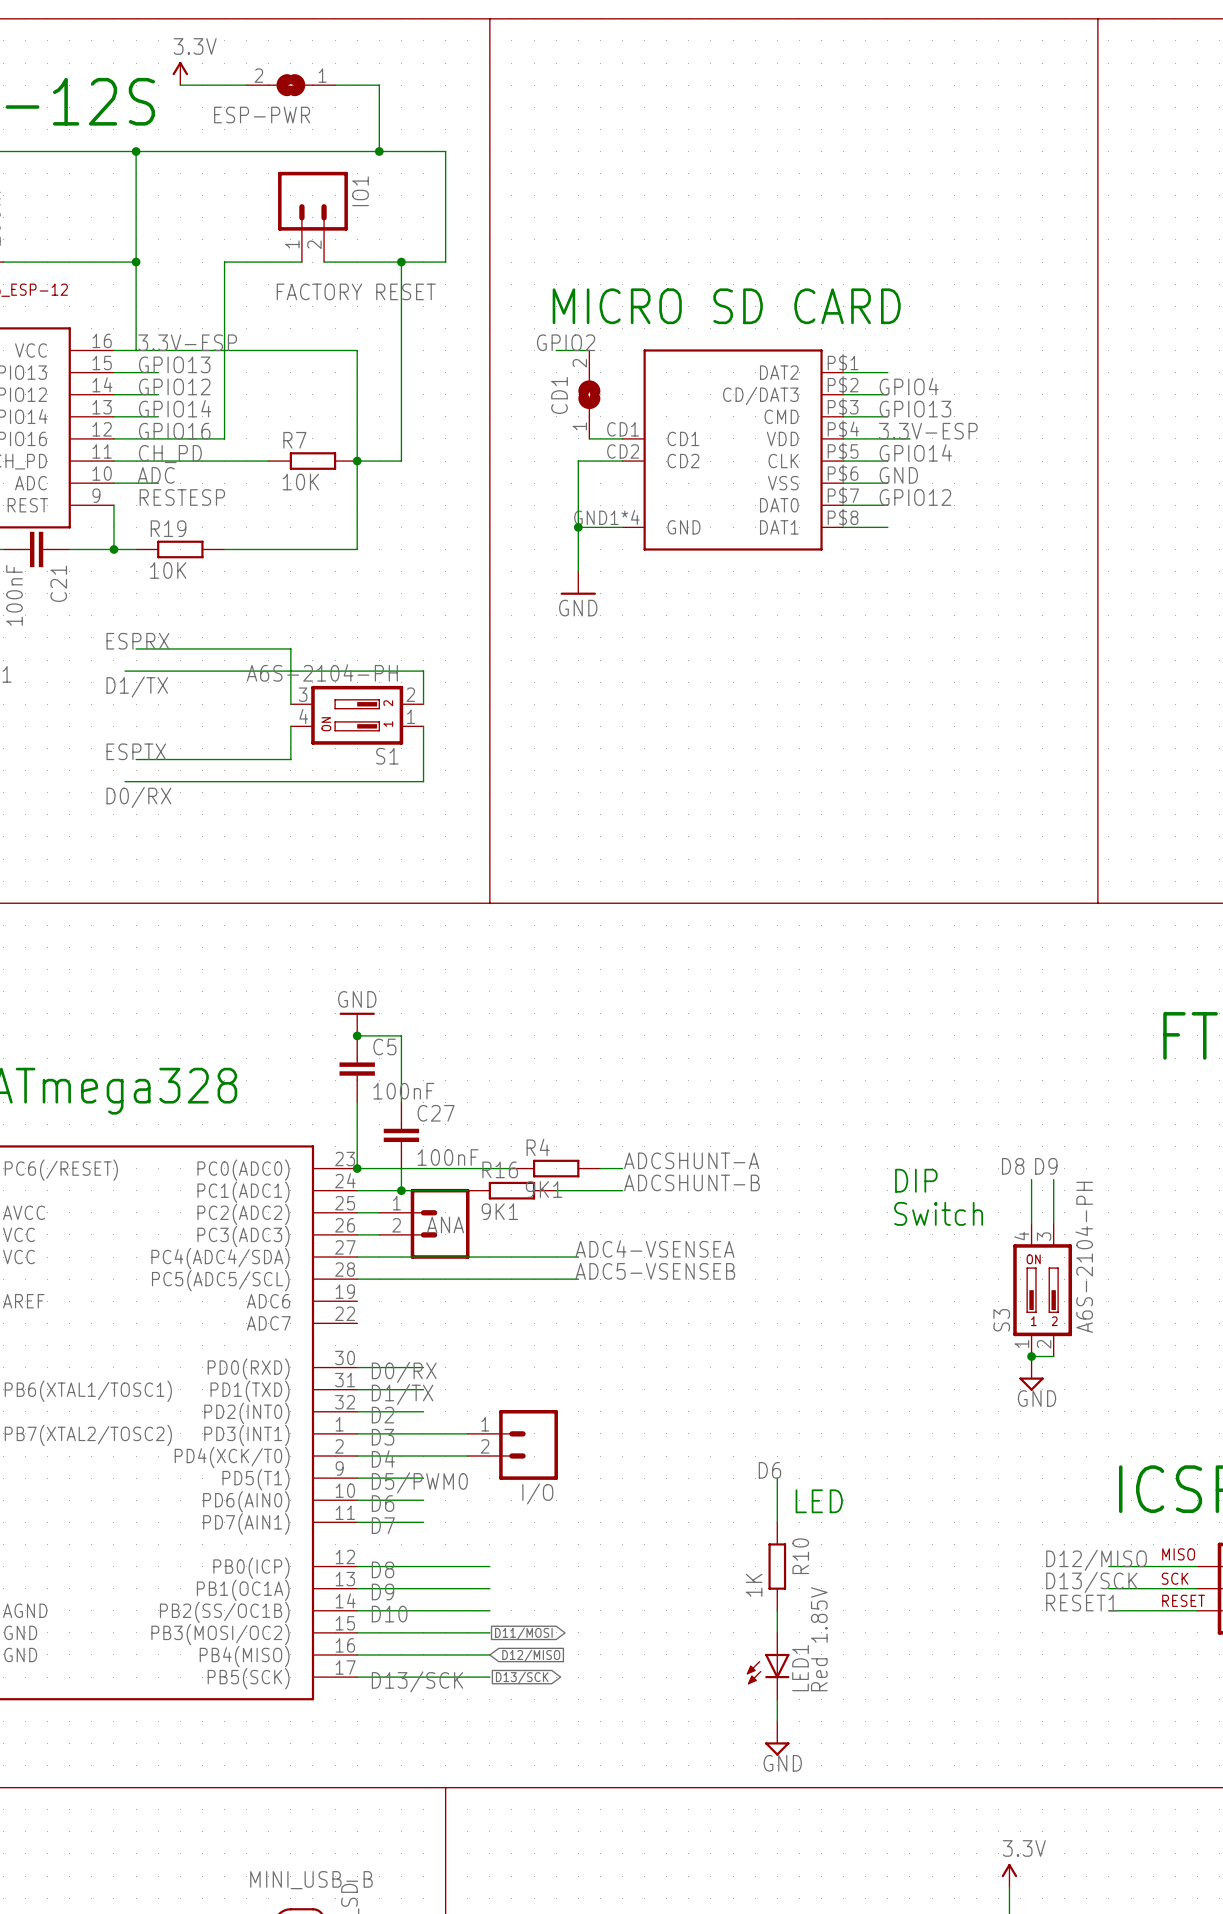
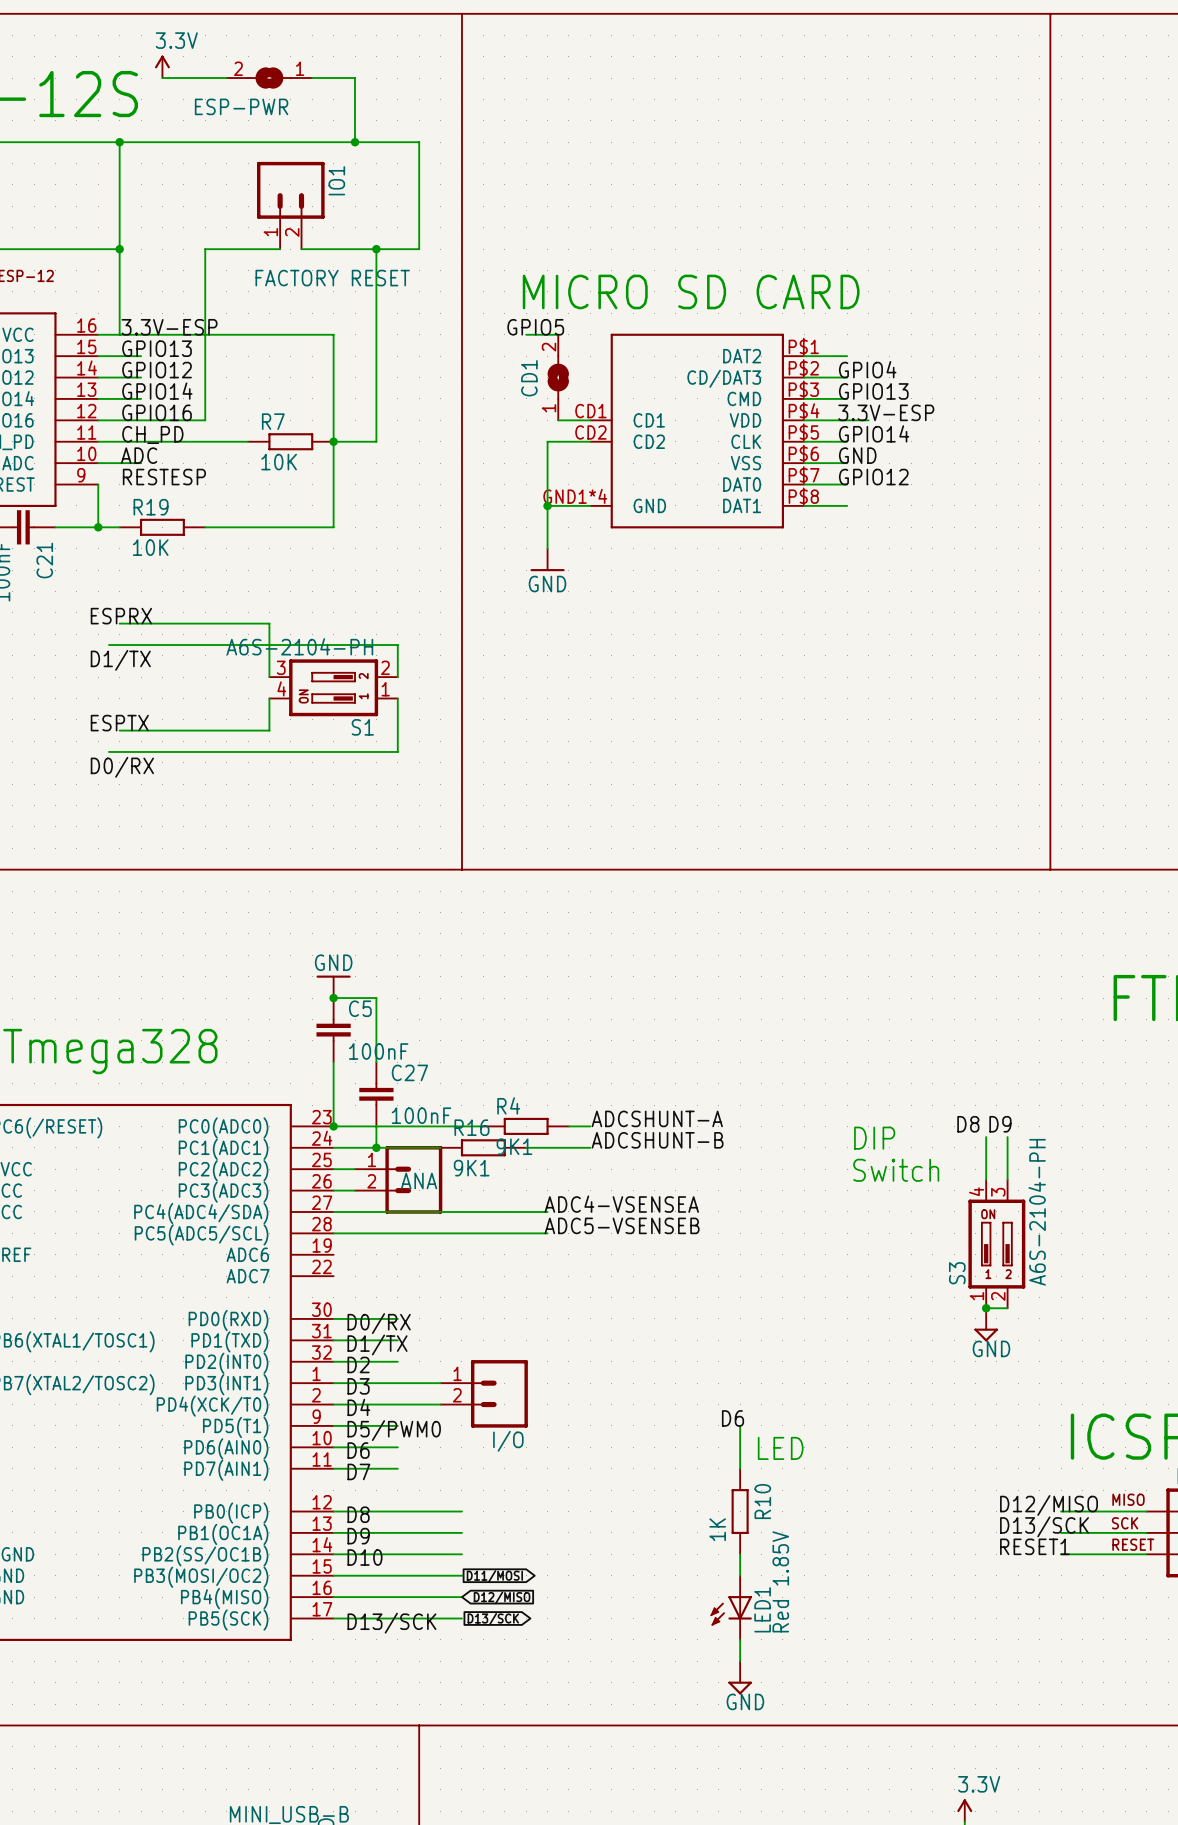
label: GPIO2 (566, 342) -> GPIO5 (535, 327)

